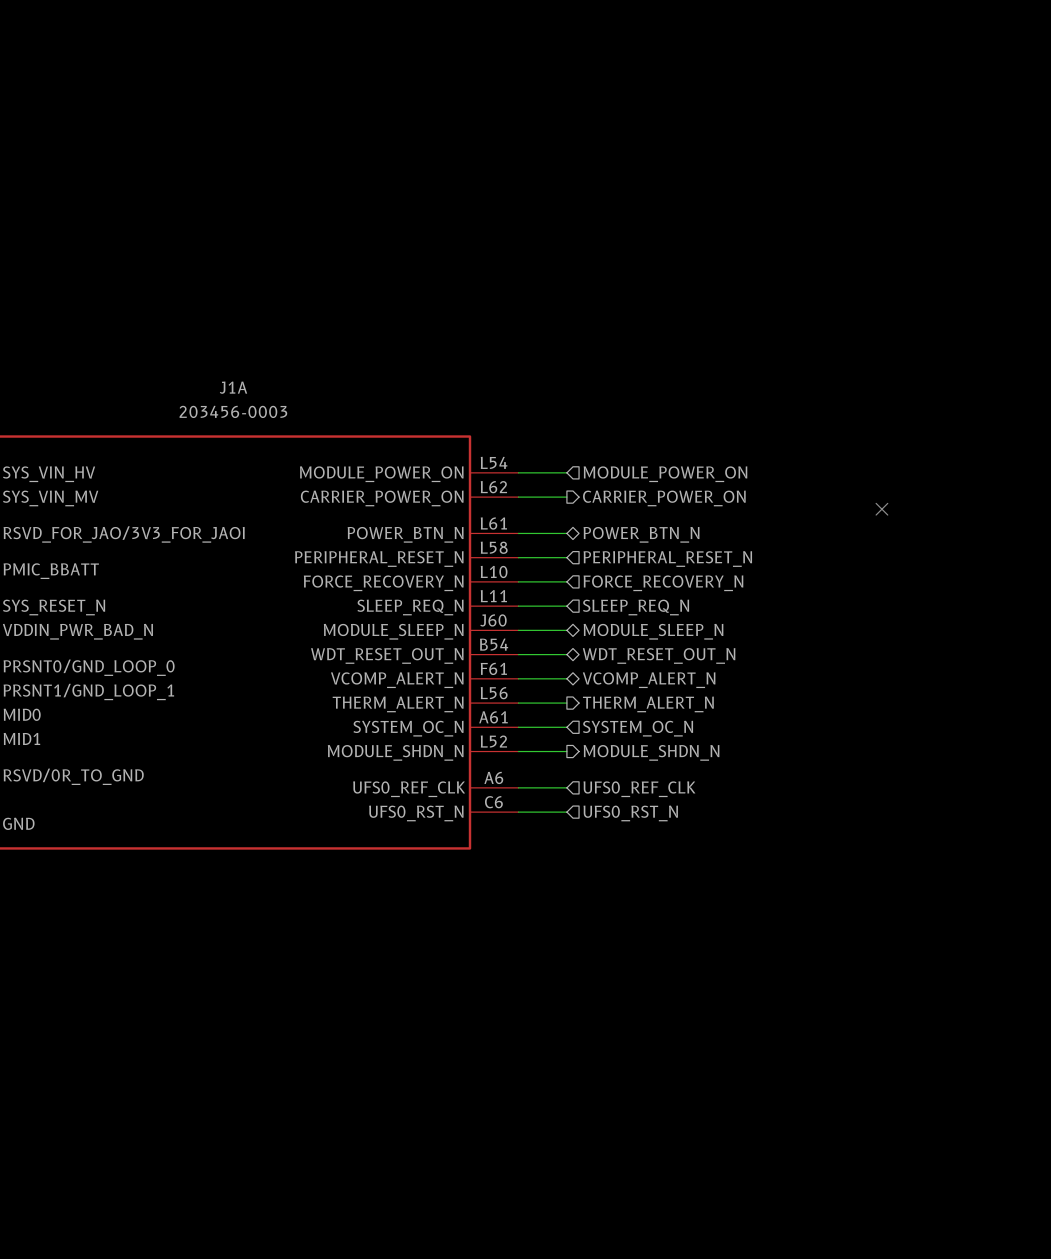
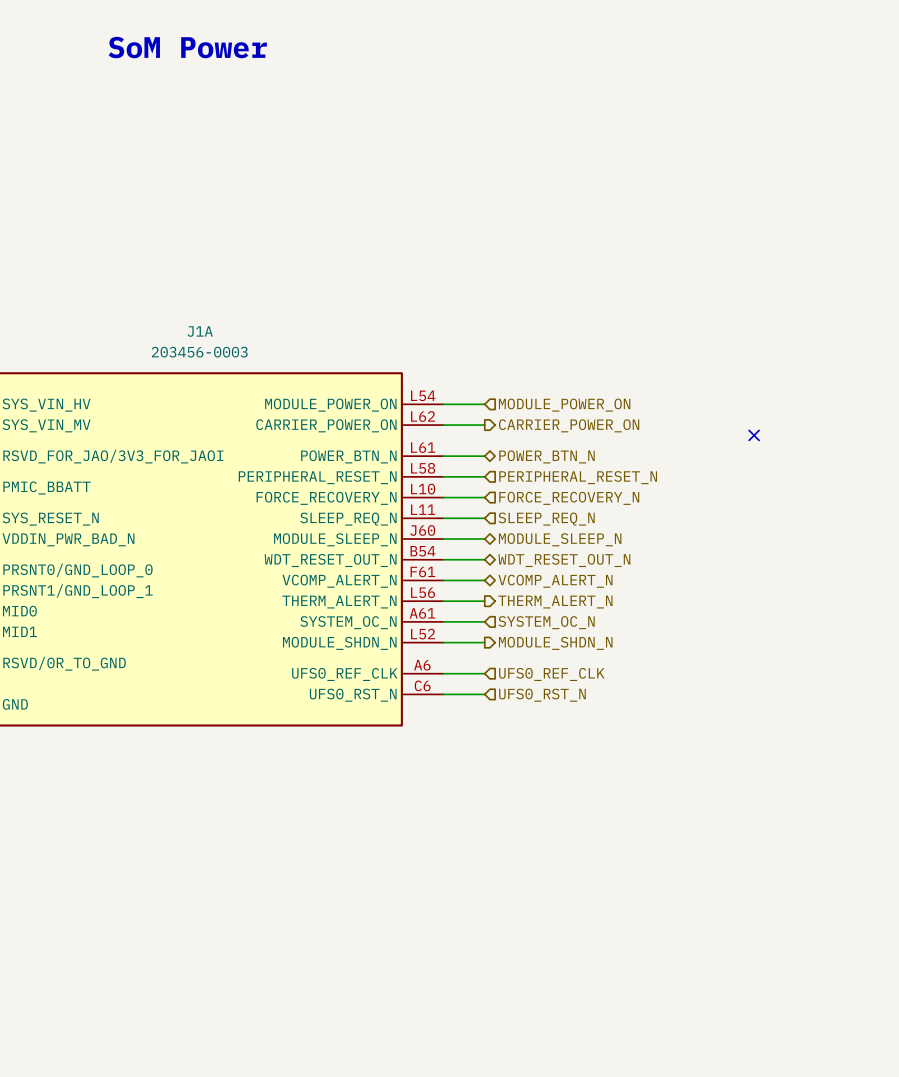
text: none -> SoM Power (187, 47)

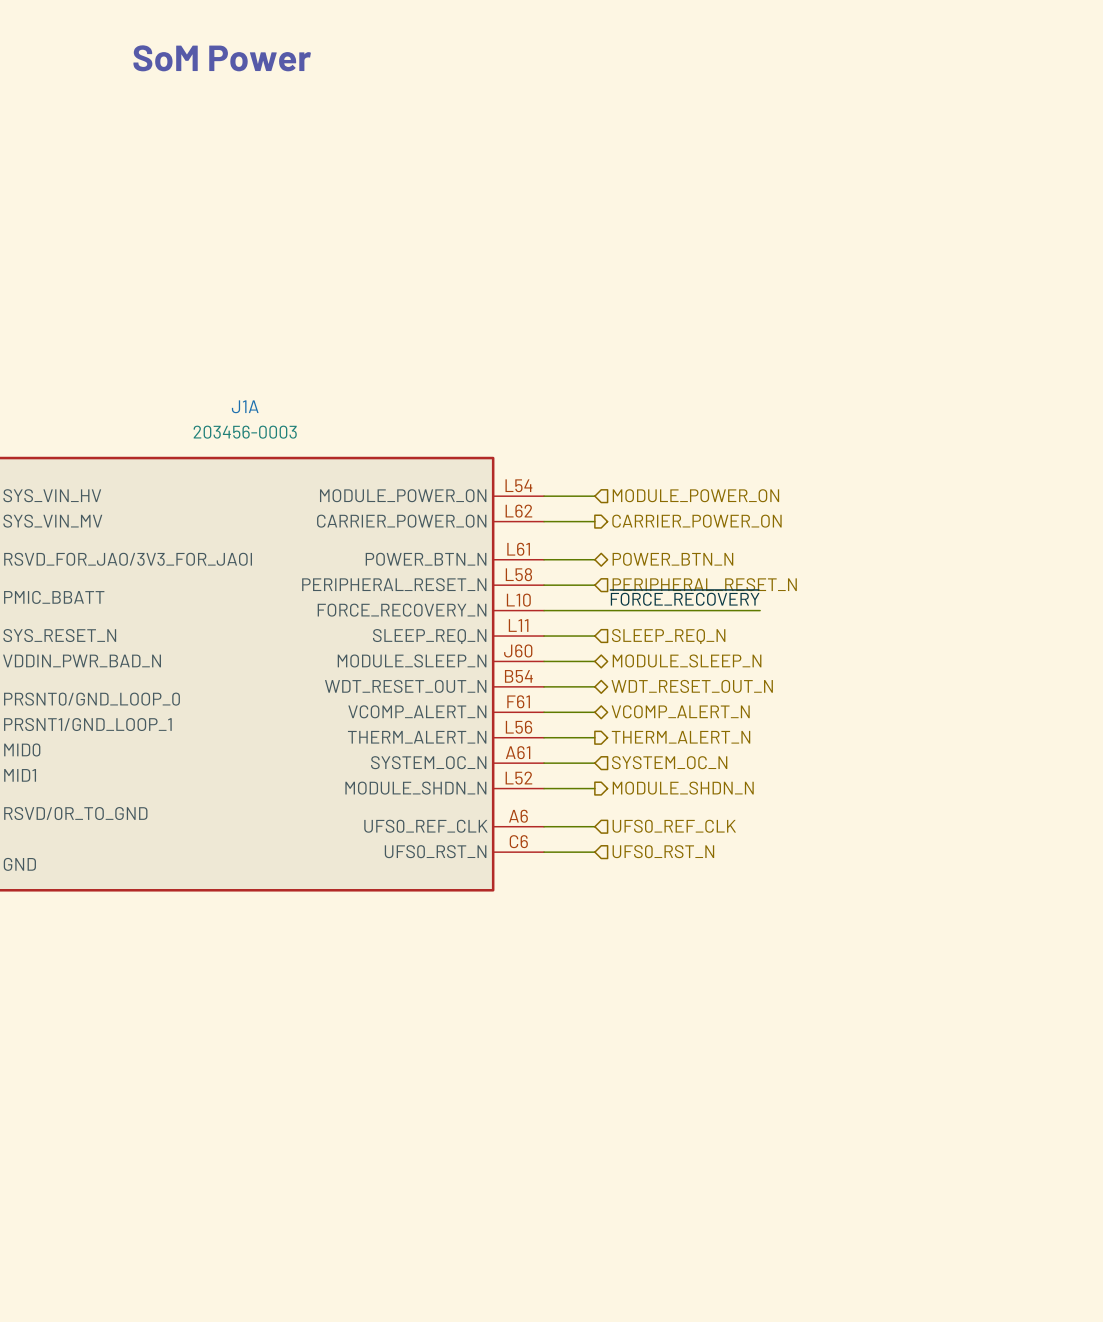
no-connect mark: (754, 435) -> none
label: none -> ~{FORCE_RECOVERY} (684, 597)
wire: none -> (594, 610) (760, 610)
hierarchical label: FORCE_RECOVERY_N (569, 498) -> none

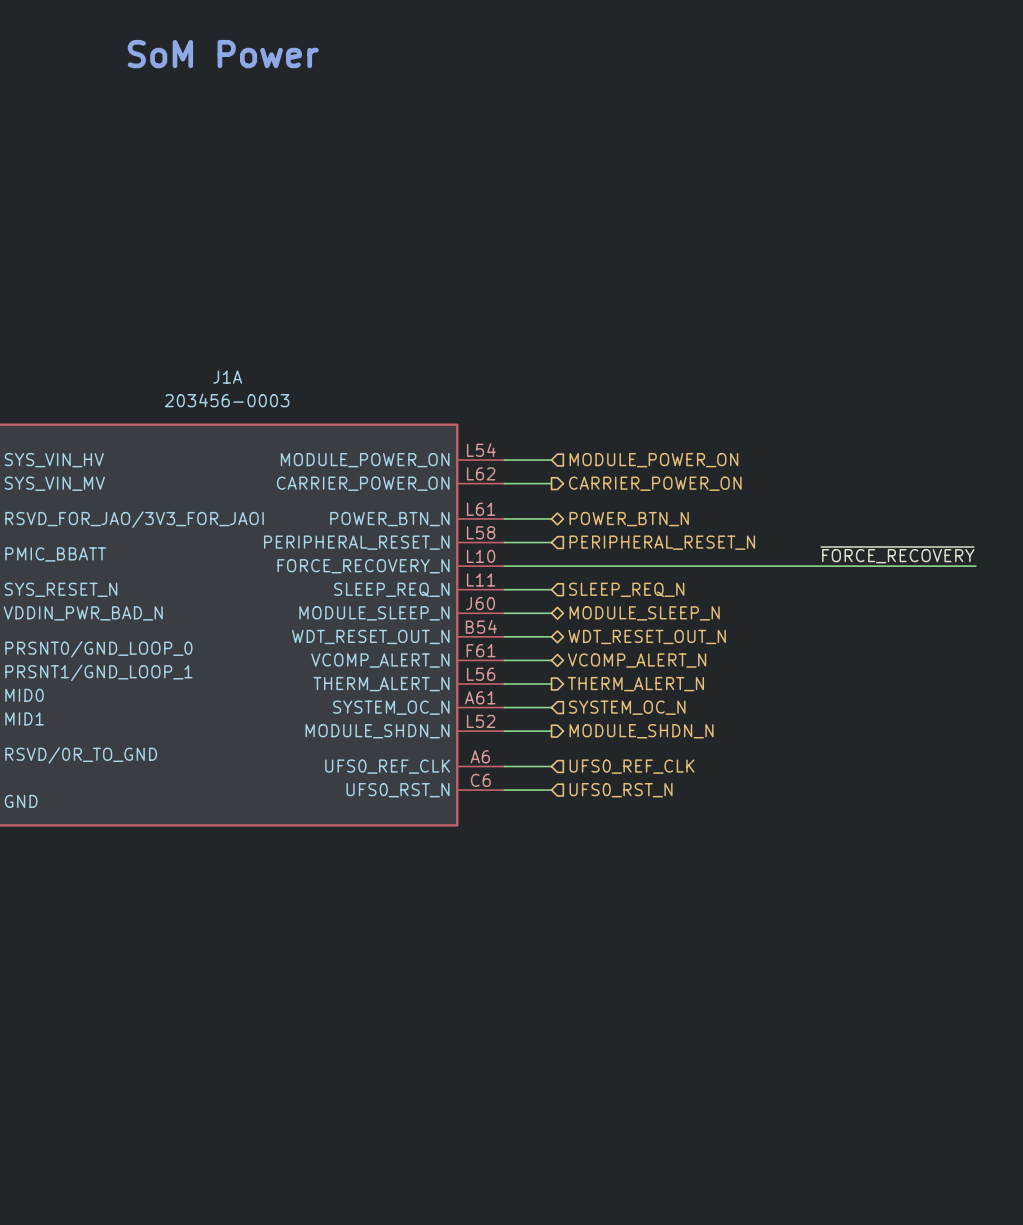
label: ~{FORCE_RECOVERY} (684, 597) -> none
label: none -> ~{FORCE_RECOVERY} (897, 554)
wire: none -> (704, 566) (975, 566)

